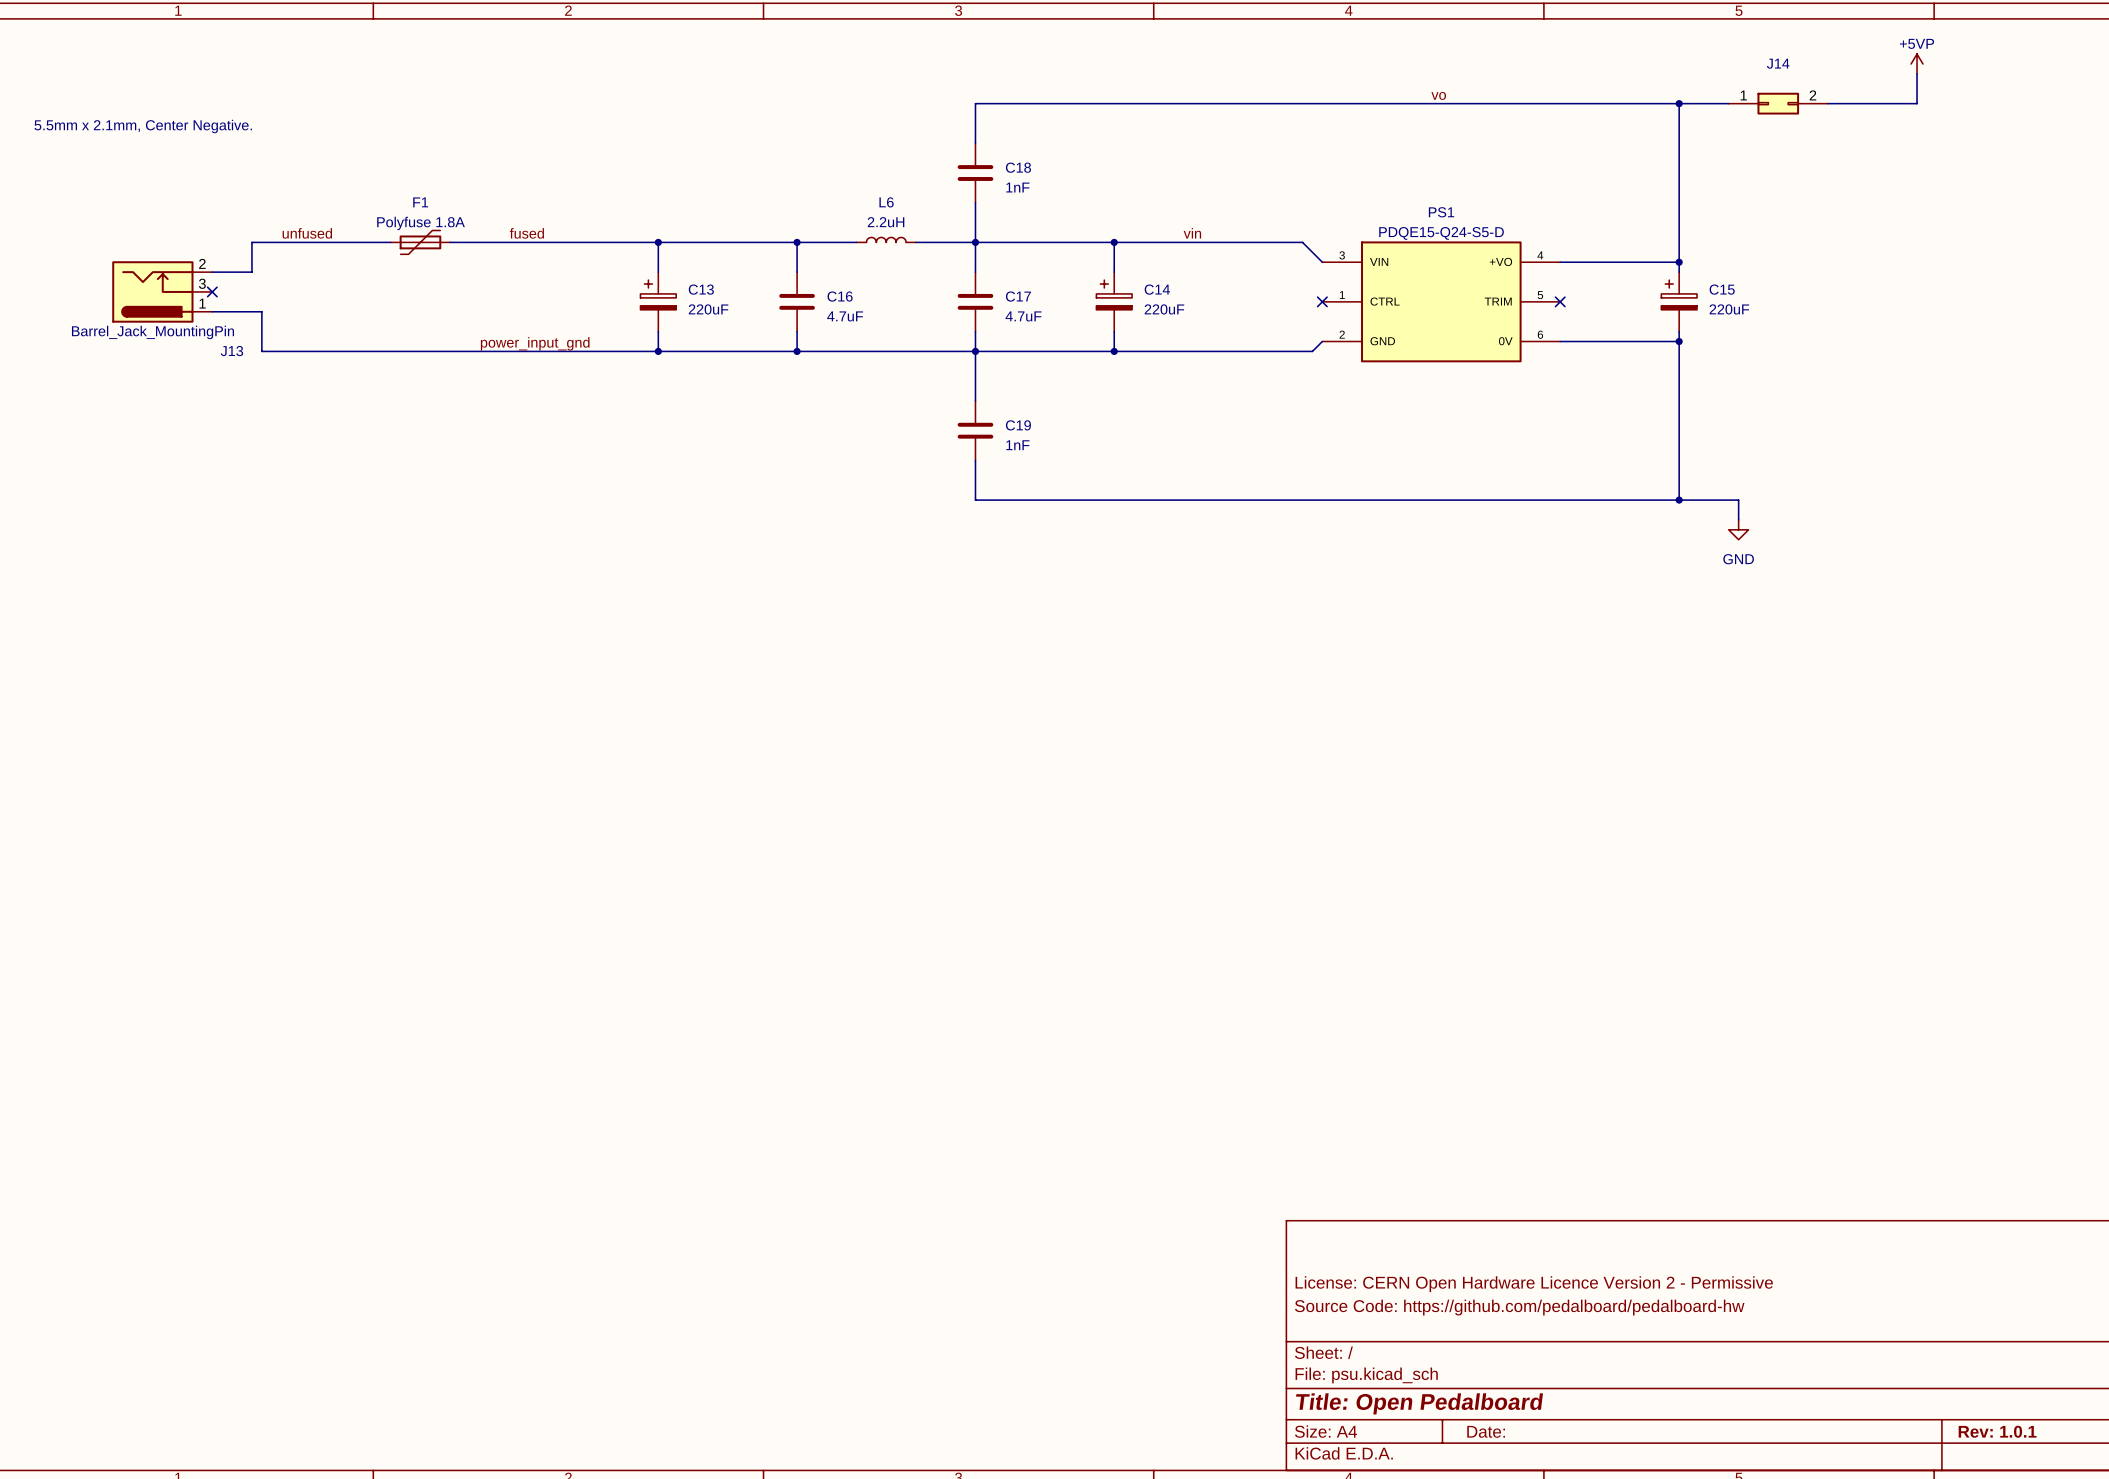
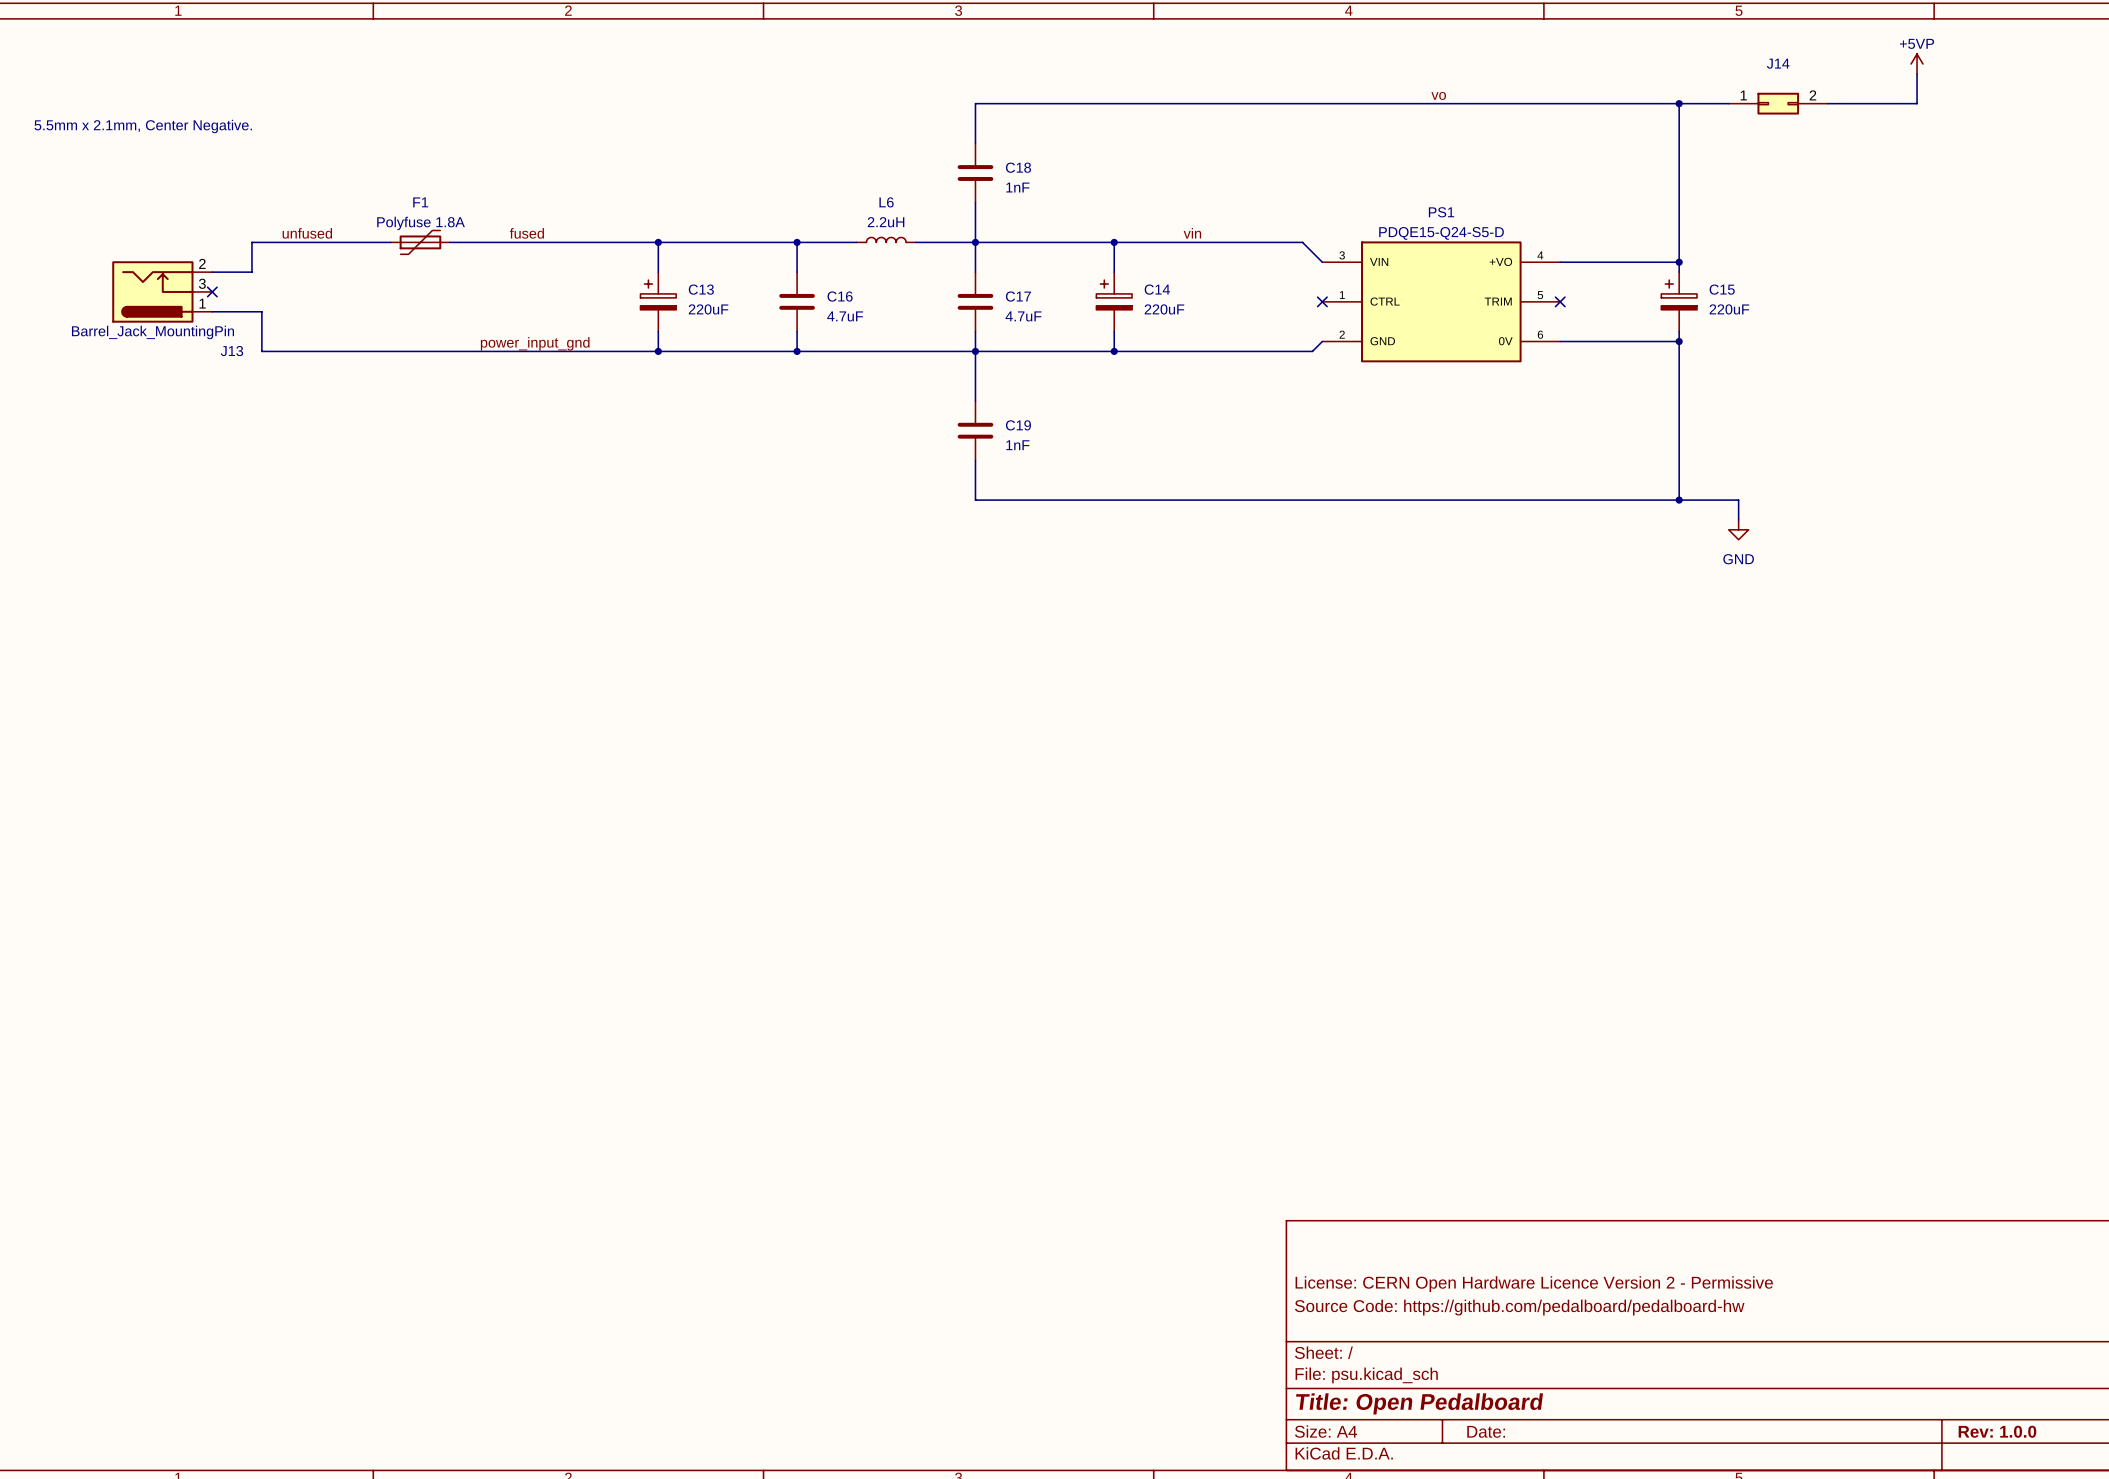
title block: Rev: 1.0.1 (1997, 1431) -> Rev: 1.0.0 (1997, 1431)

